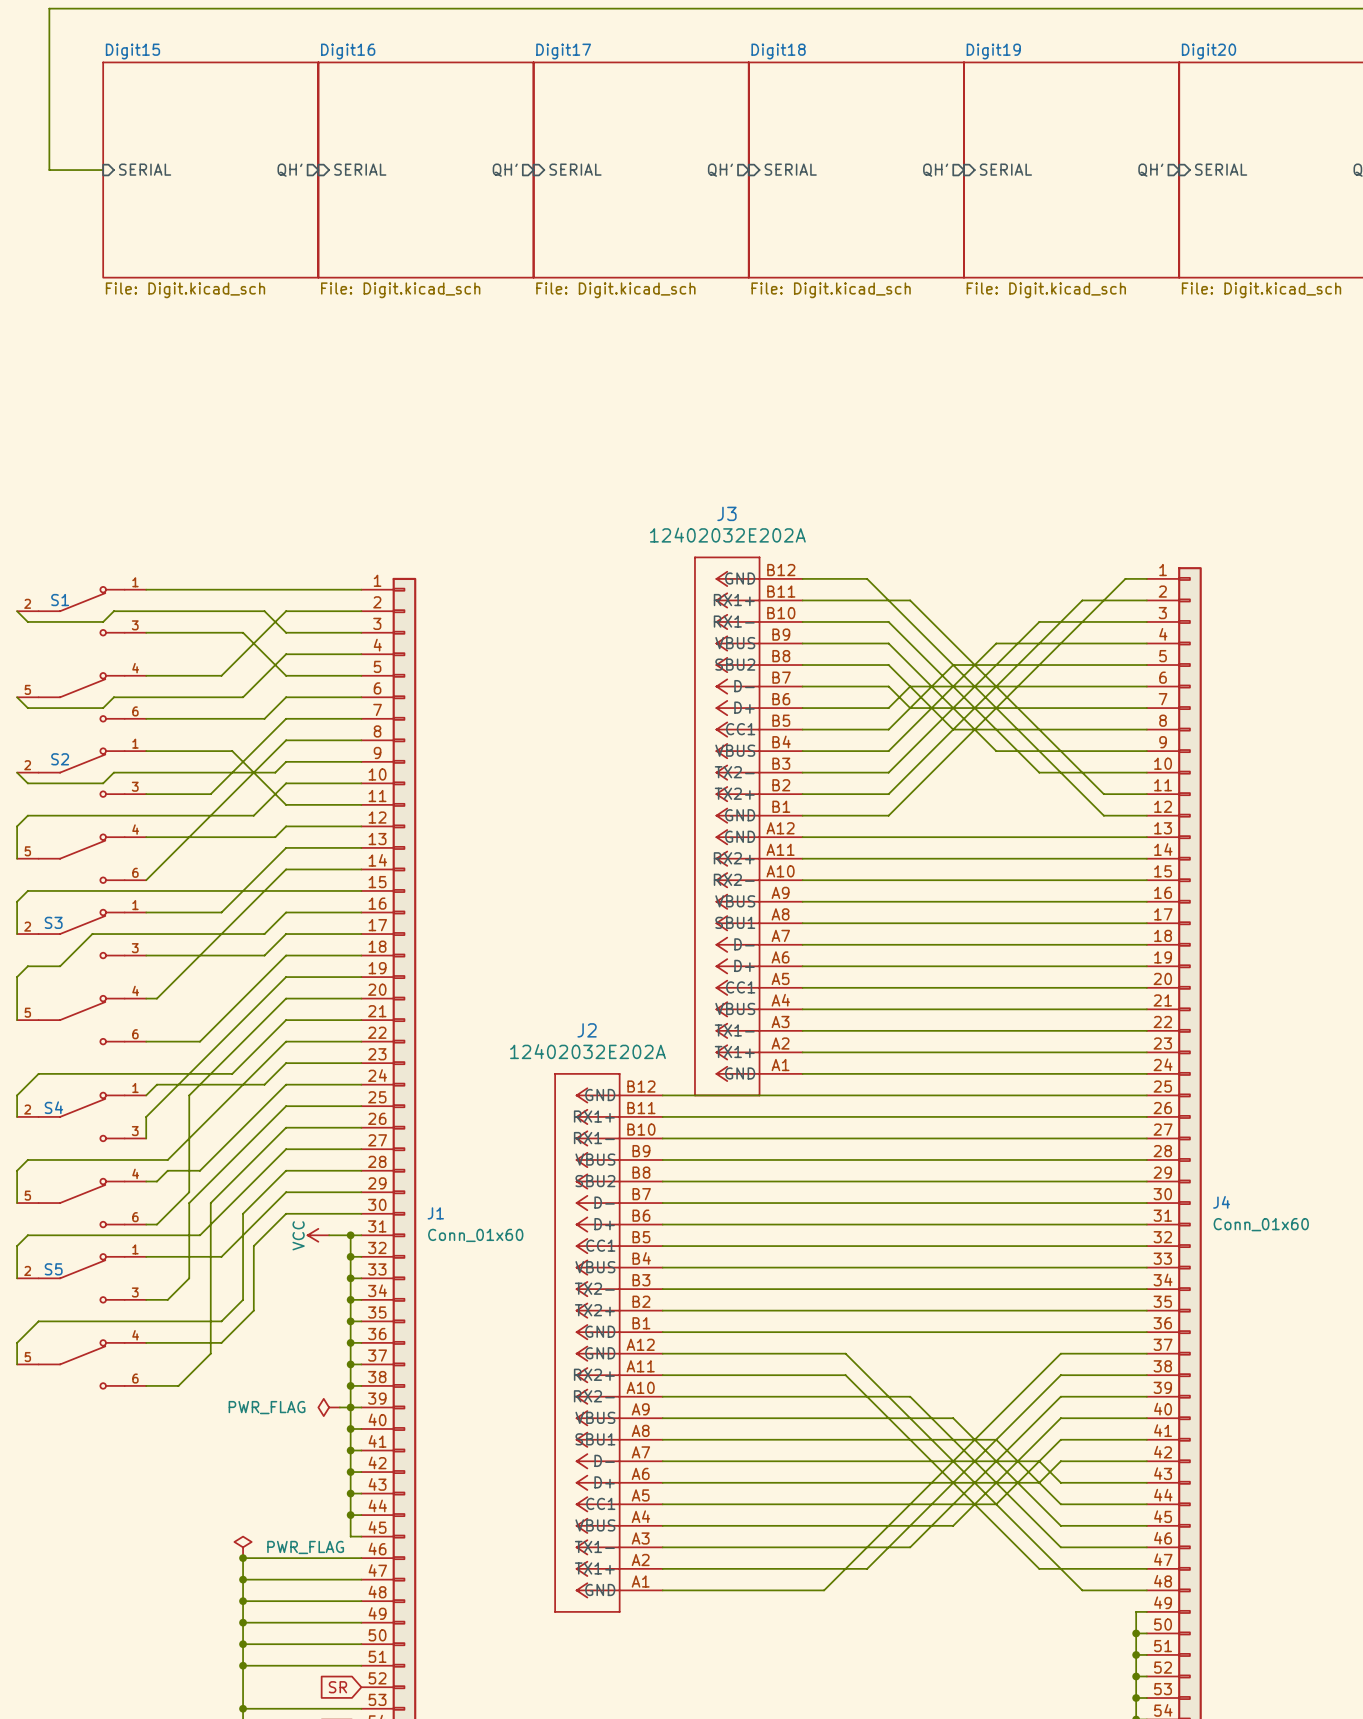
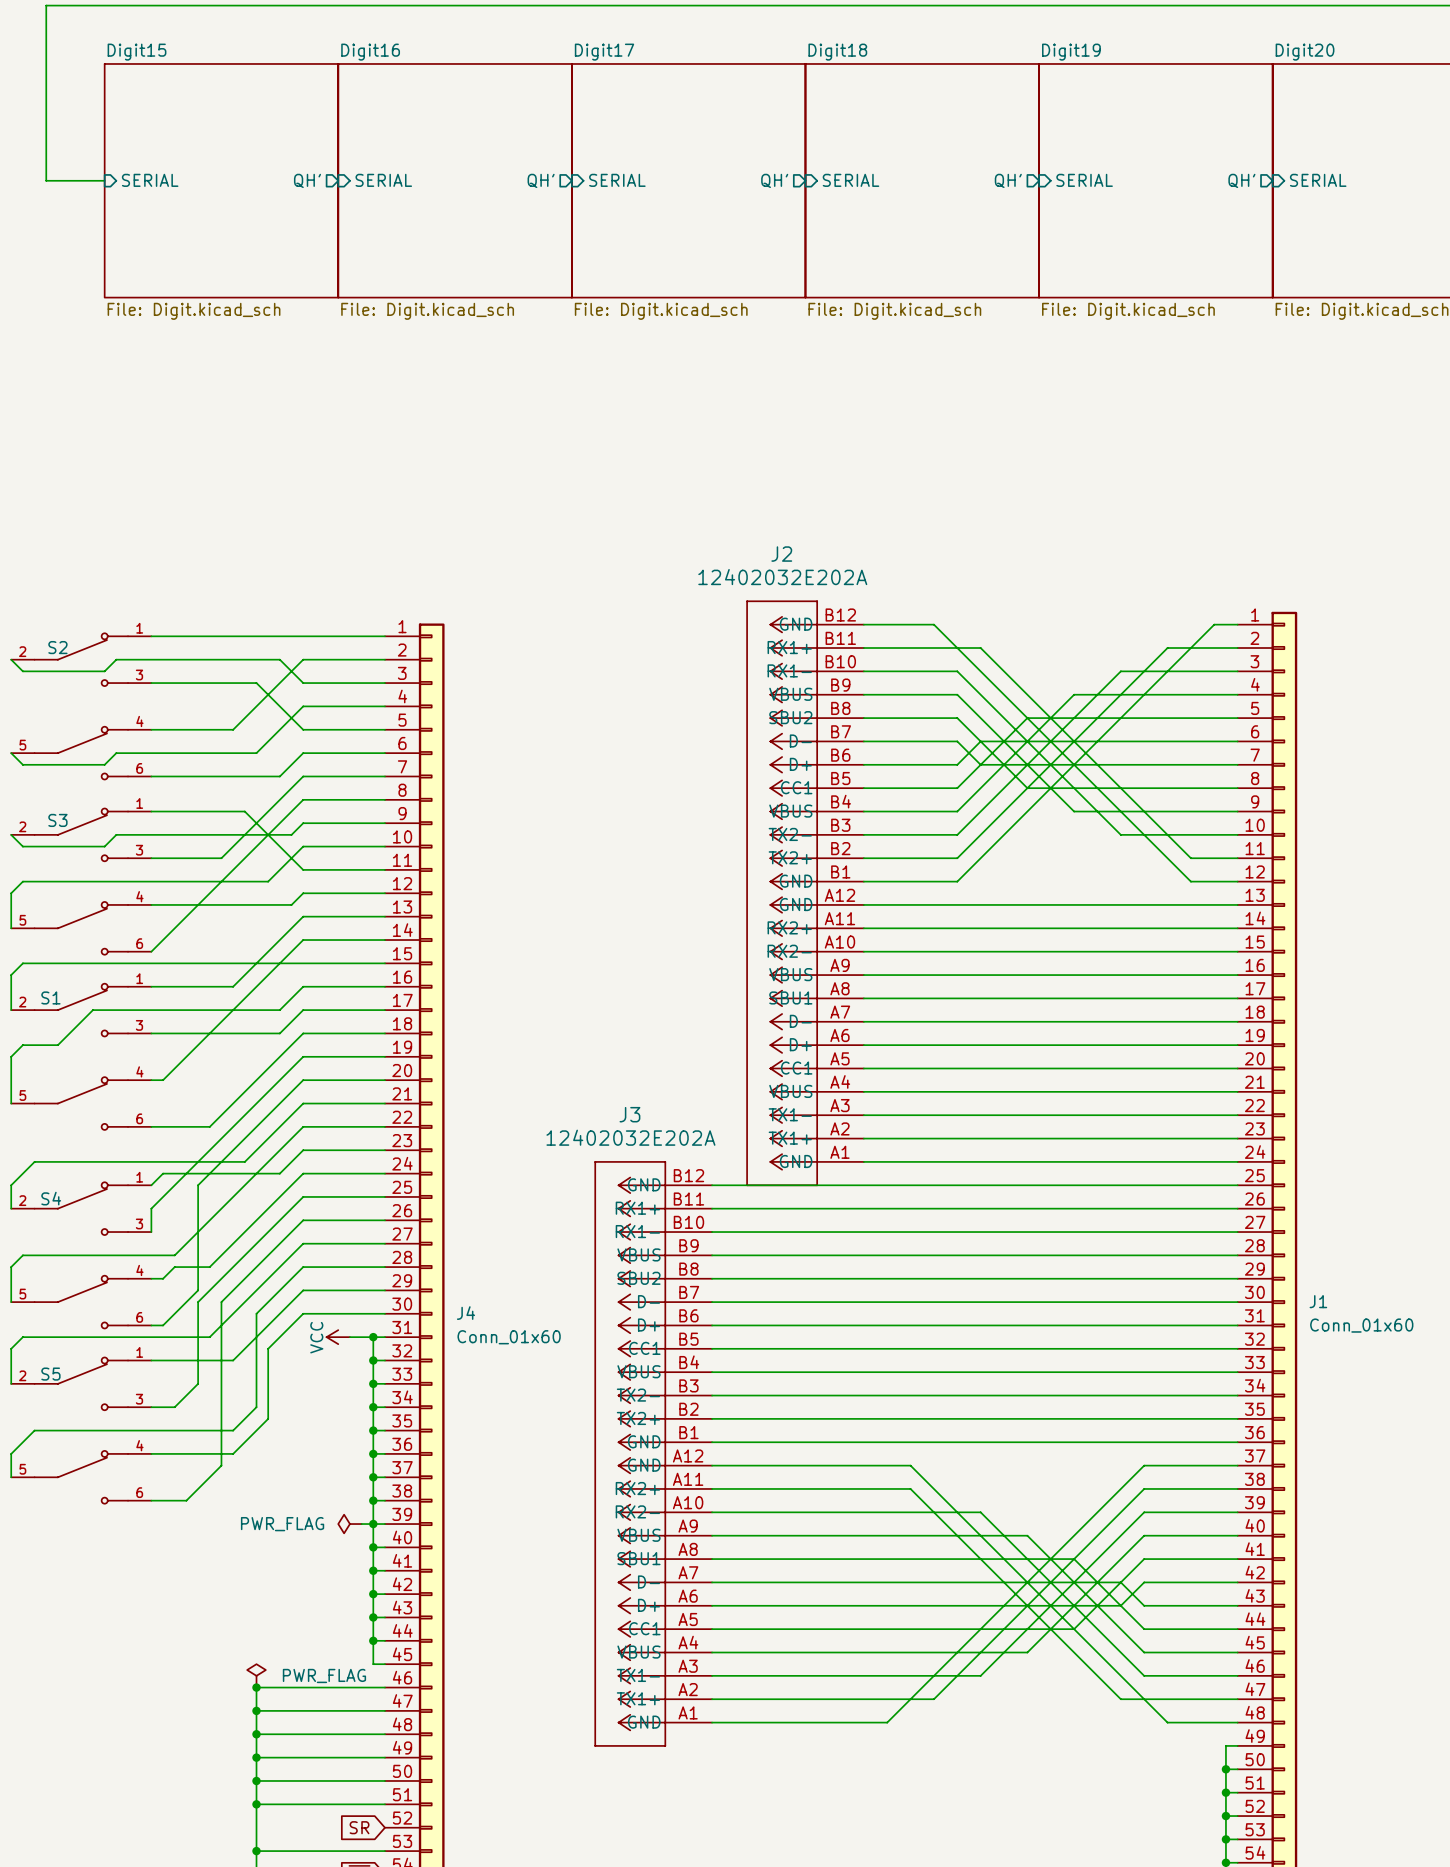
J3 name: J3 (726, 513) -> J2 (781, 554)
S1 name: S1 (60, 600) -> S2 (57, 647)
S2 name: S2 (60, 759) -> S3 (57, 820)
S3 name: S3 (53, 922) -> S1 (50, 997)
J2 name: J2 (587, 1030) -> J3 (629, 1114)
J4 name: J4 (1221, 1202) -> J1 (1318, 1301)
J1 name: J1 (435, 1213) -> J4 (466, 1313)

